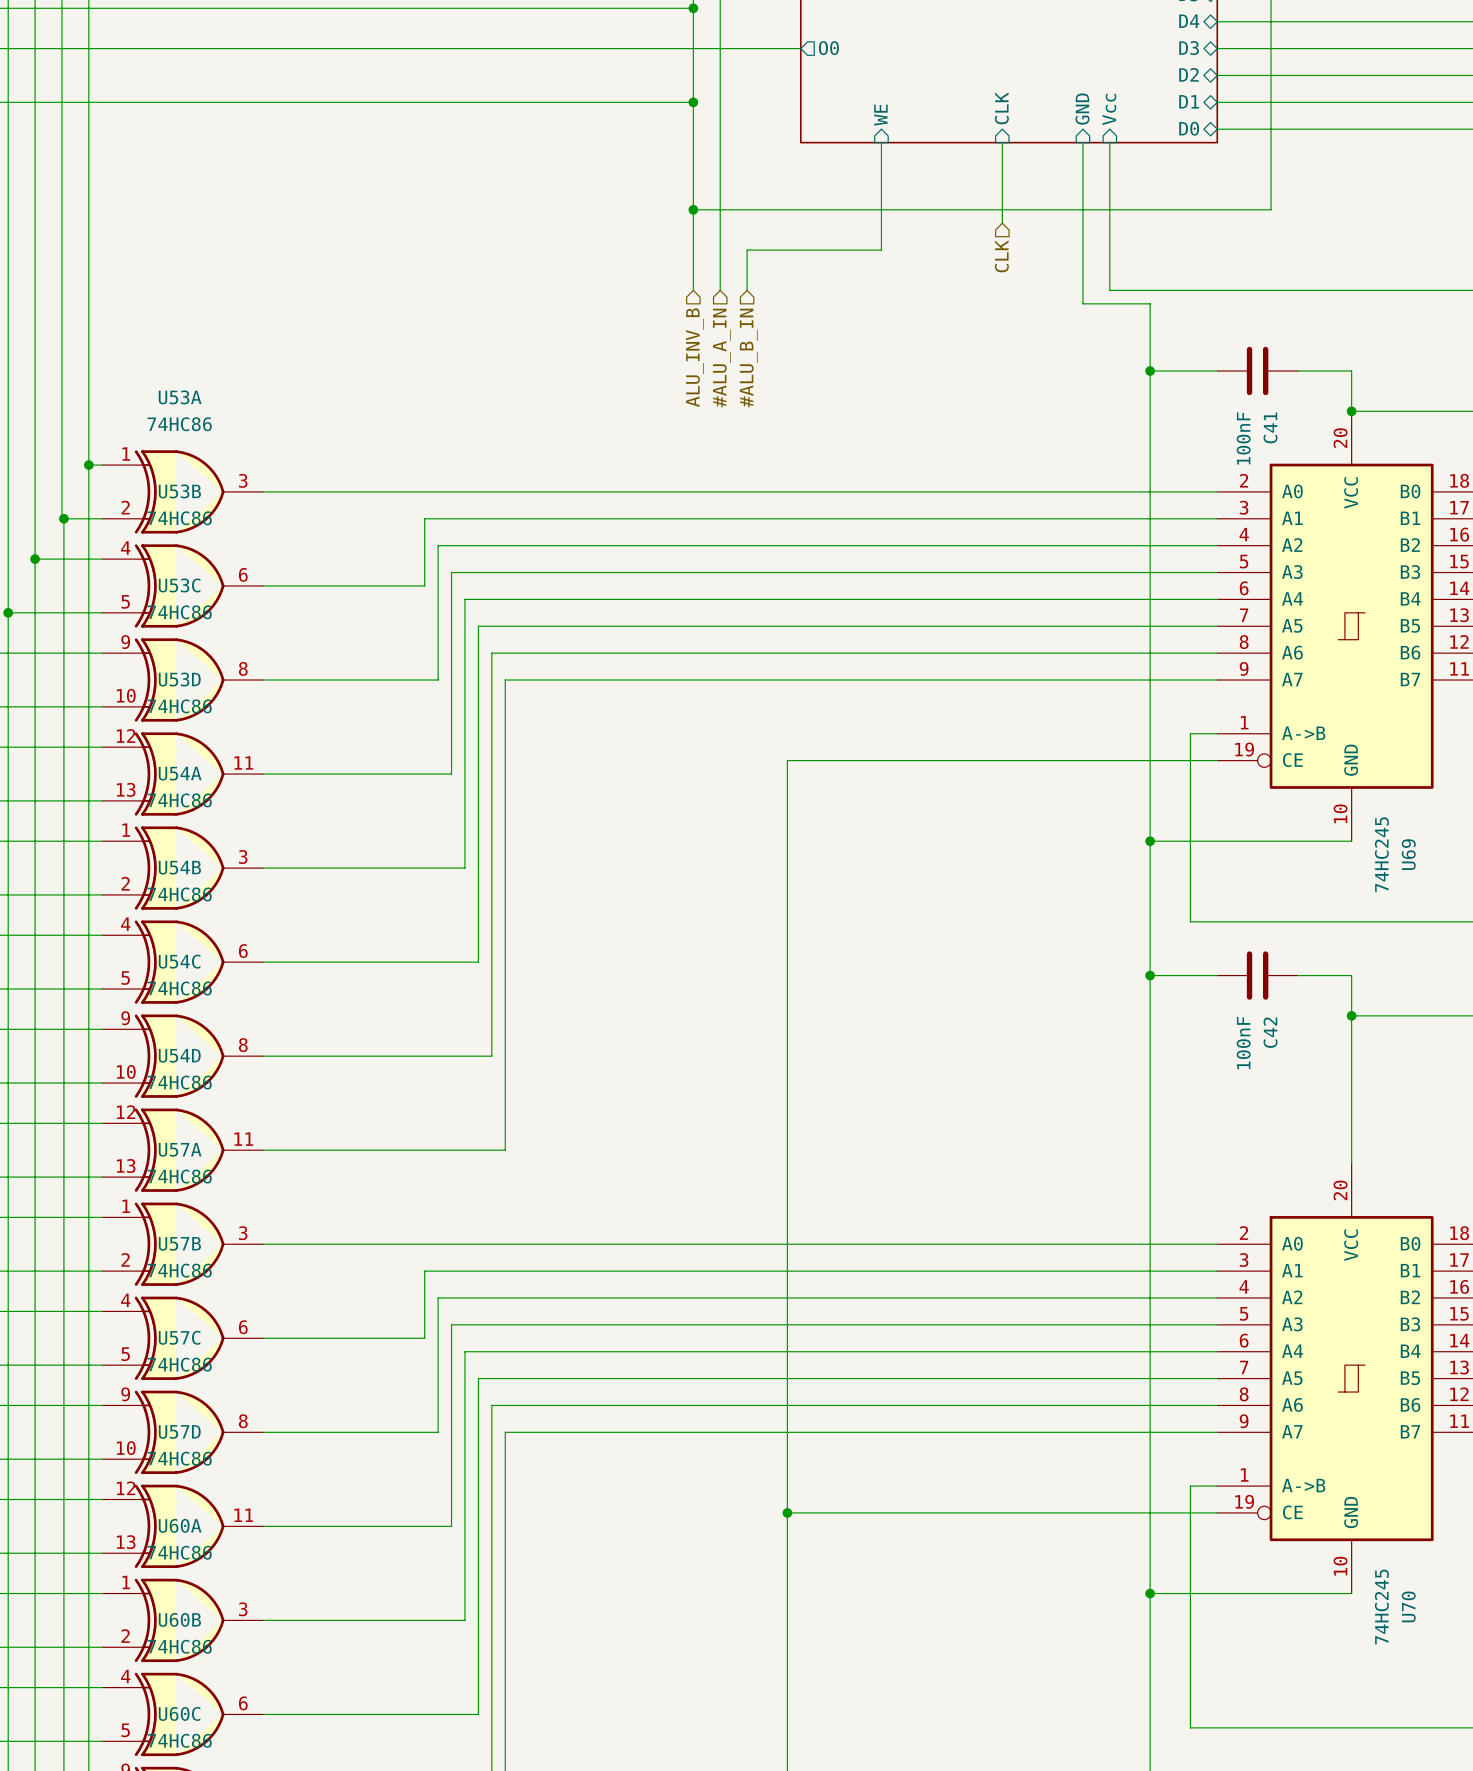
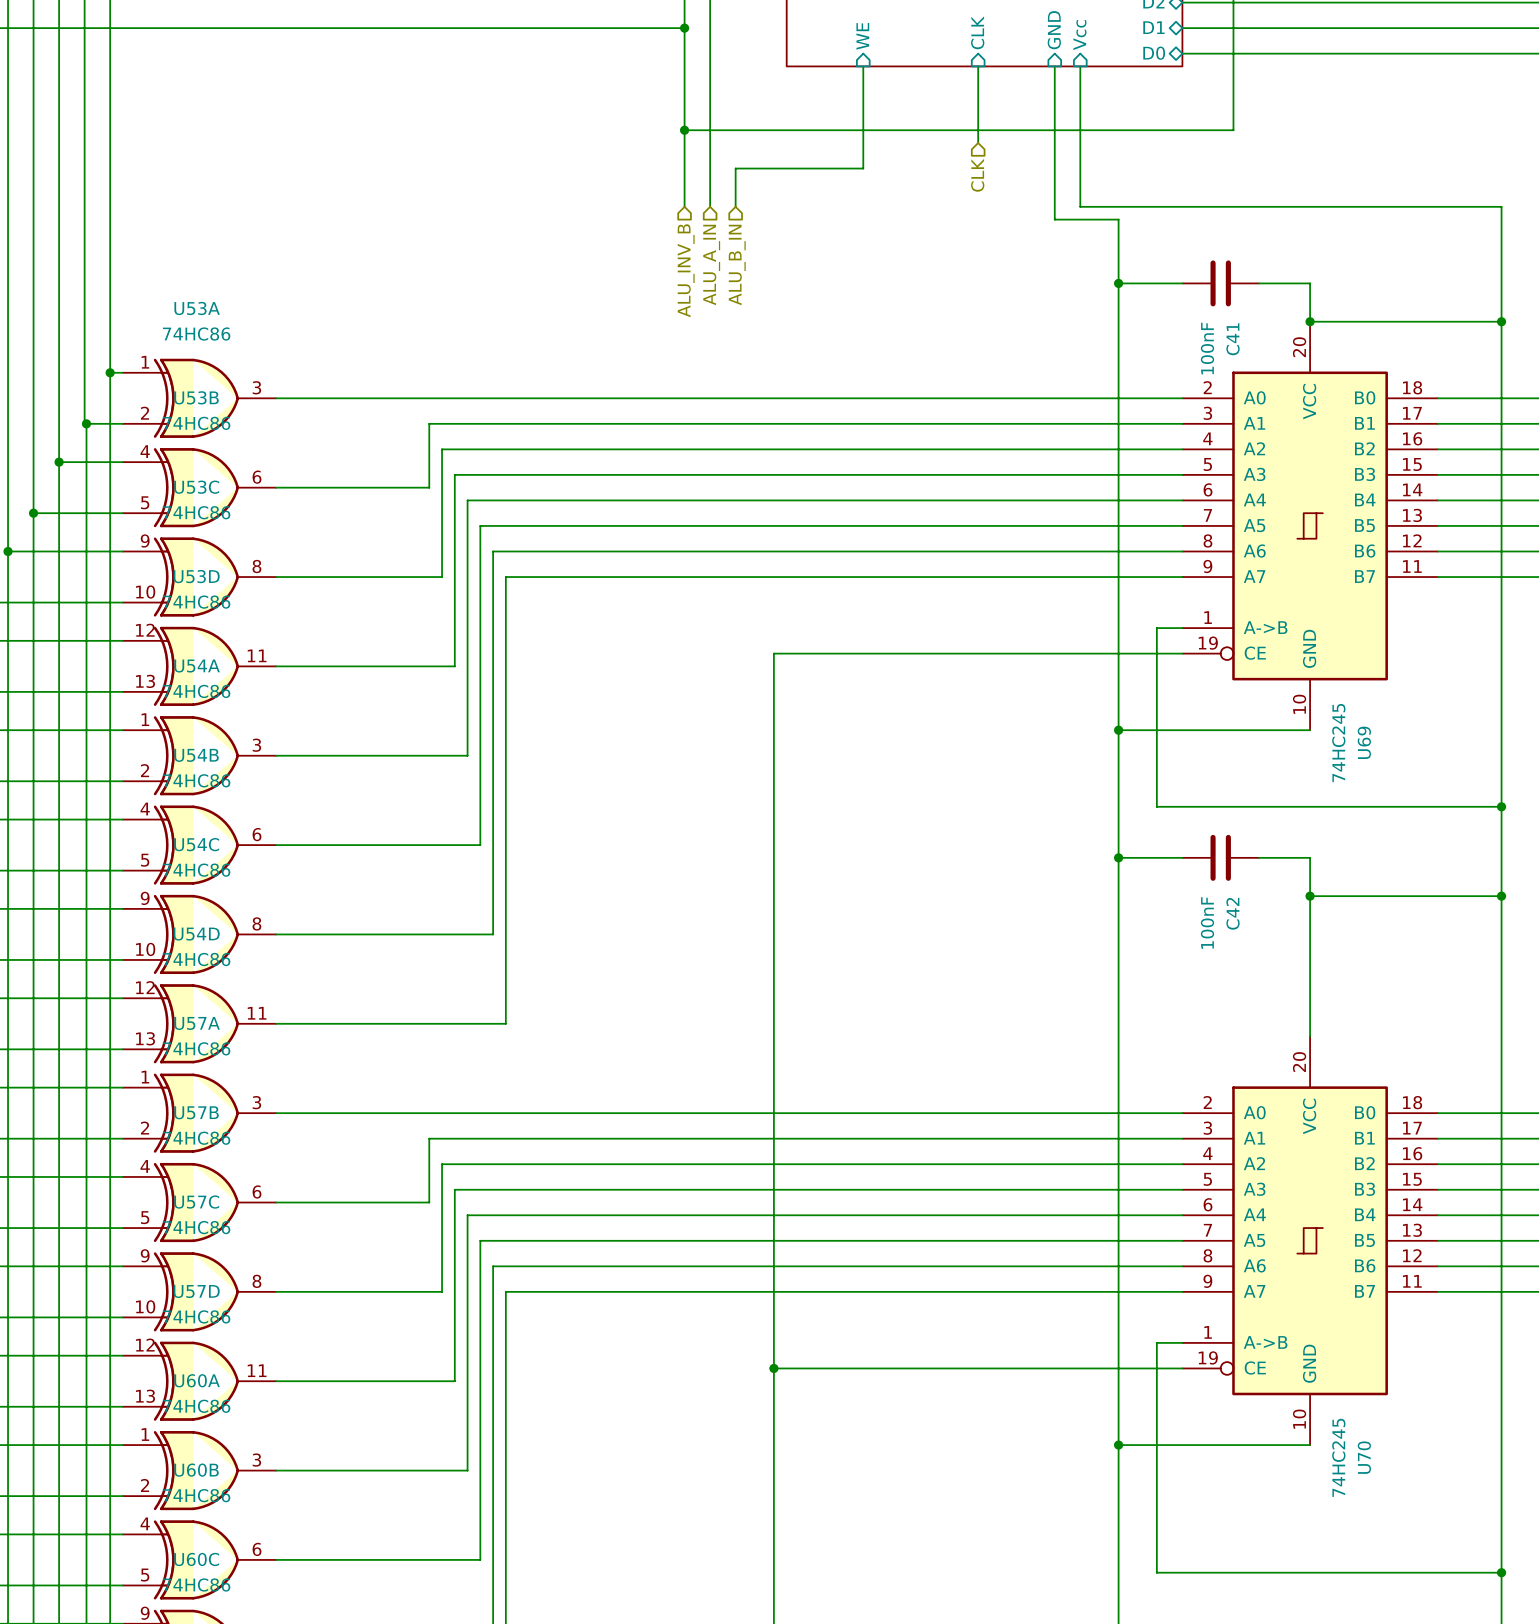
hierarchical label: #ALU_A_IN (721, 358) -> ALU_A_IN (711, 264)
hierarchical label: #ALU_B_IN (748, 358) -> ALU_B_IN (737, 265)

